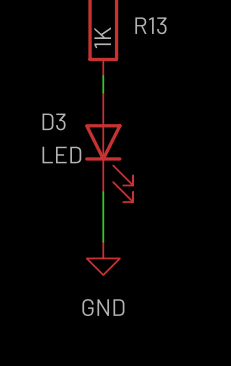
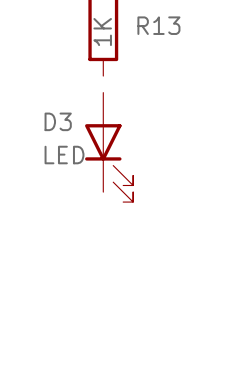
wire: (103, 76) (103, 92) -> none
wire: (103, 192) (103, 241) -> none
power symbol: GND (103, 258) -> none

